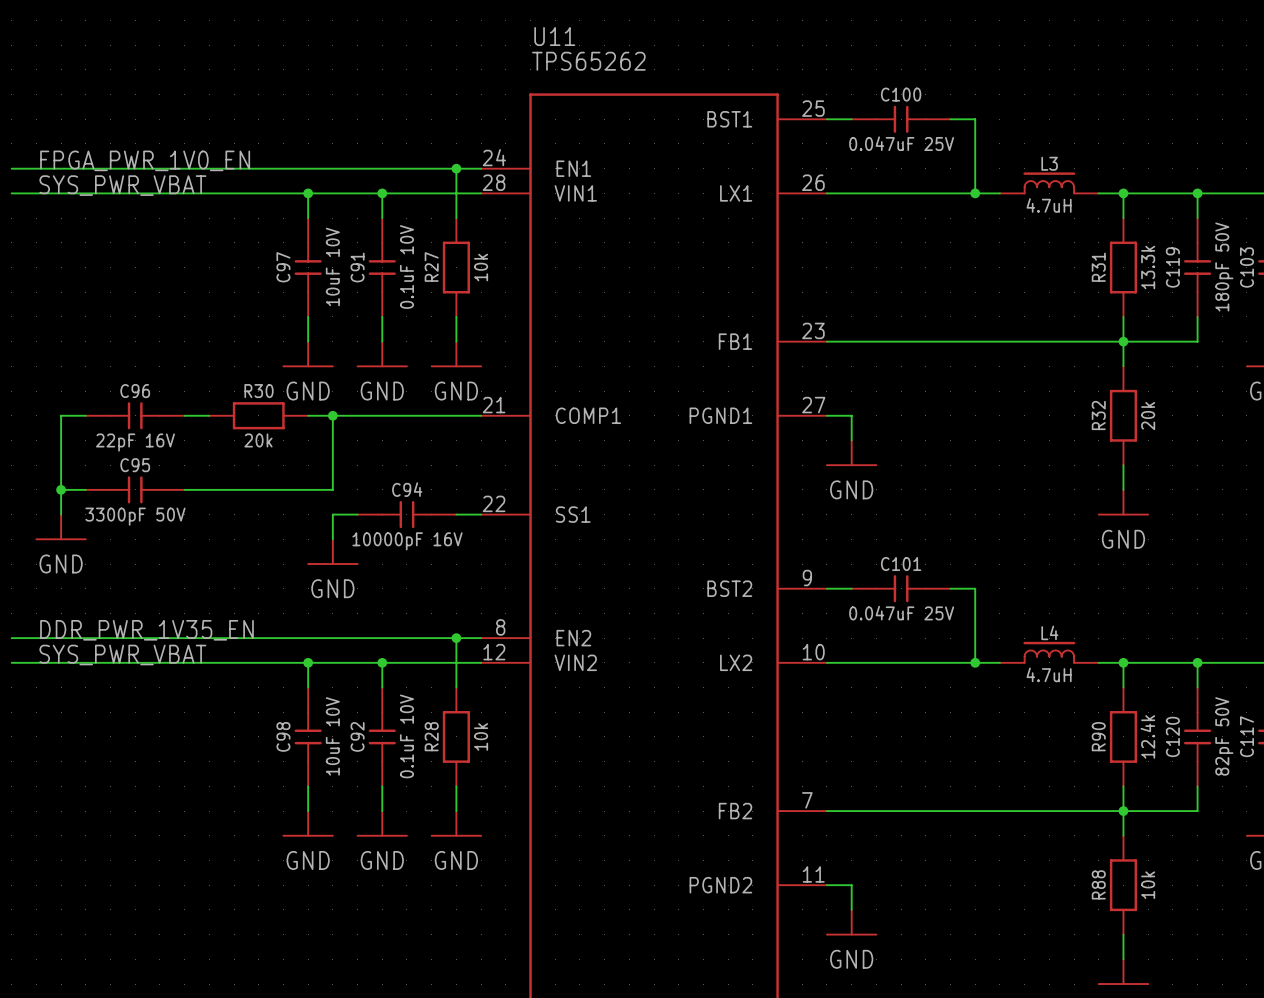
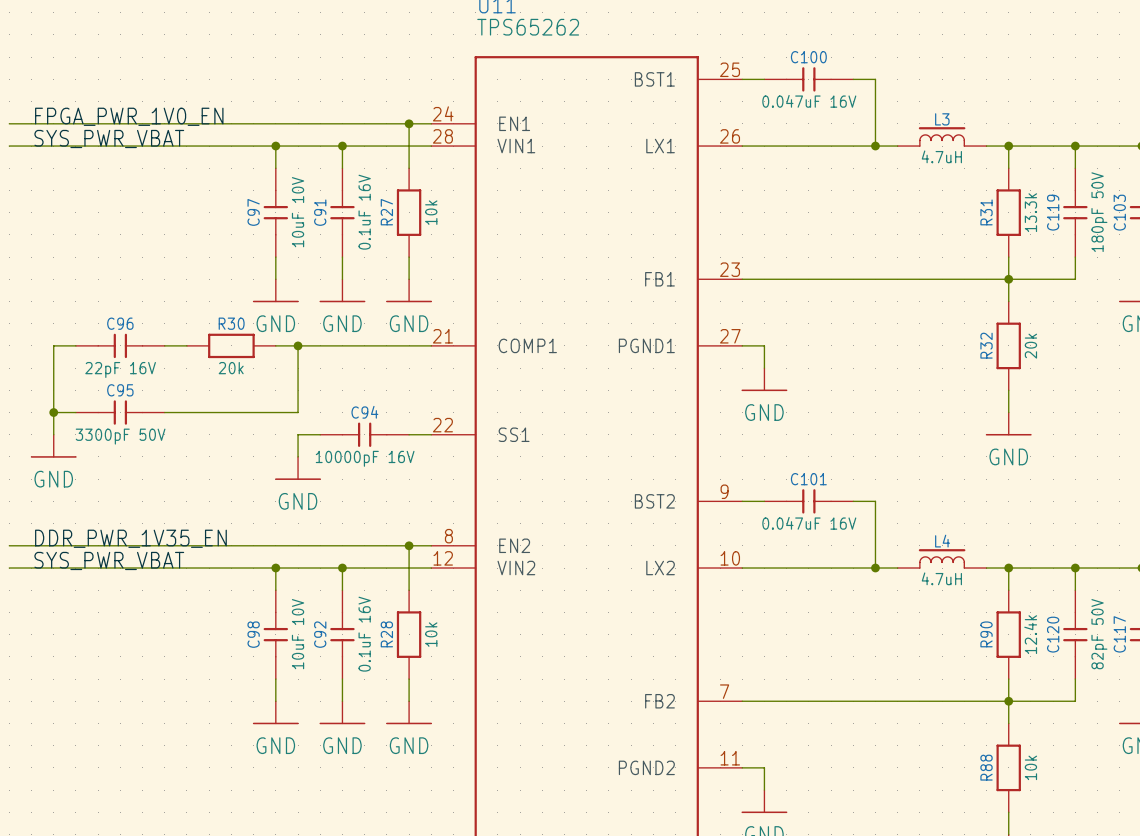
C100 value: 0.047uF 25V (901, 143) -> 0.047uF 16V (809, 101)
C91 value: 0.1uF 10V (406, 266) -> 0.1uF 16V (364, 212)
C101 value: 0.047uF 25V (901, 613) -> 0.047uF 16V (809, 523)
C92 value: 0.1uF 10V (406, 736) -> 0.1uF 16V (364, 634)

